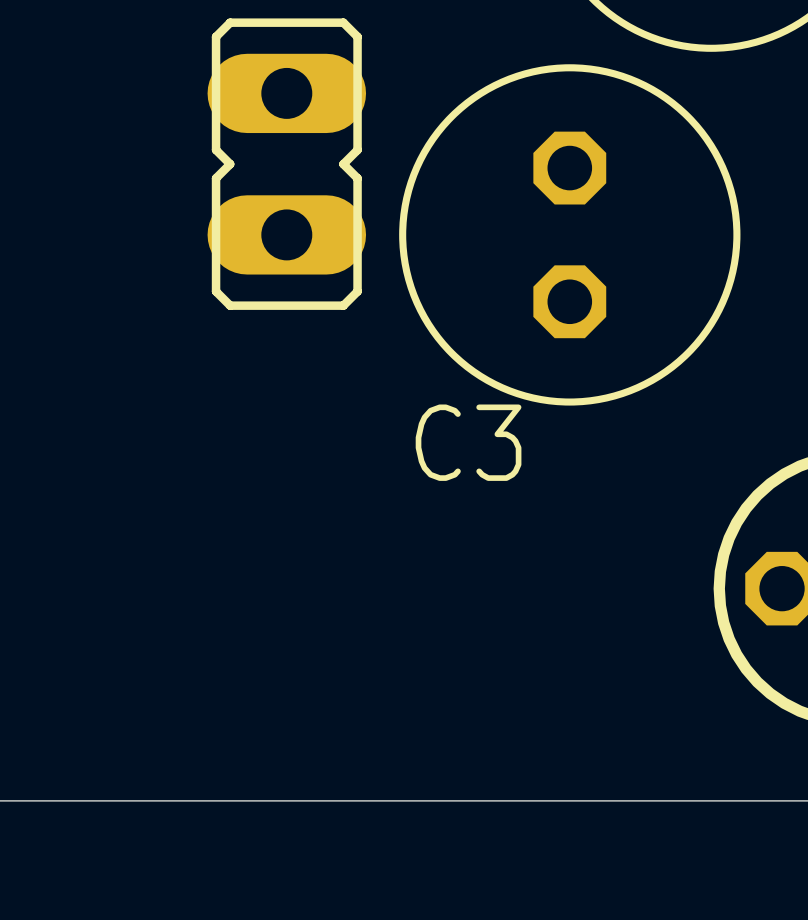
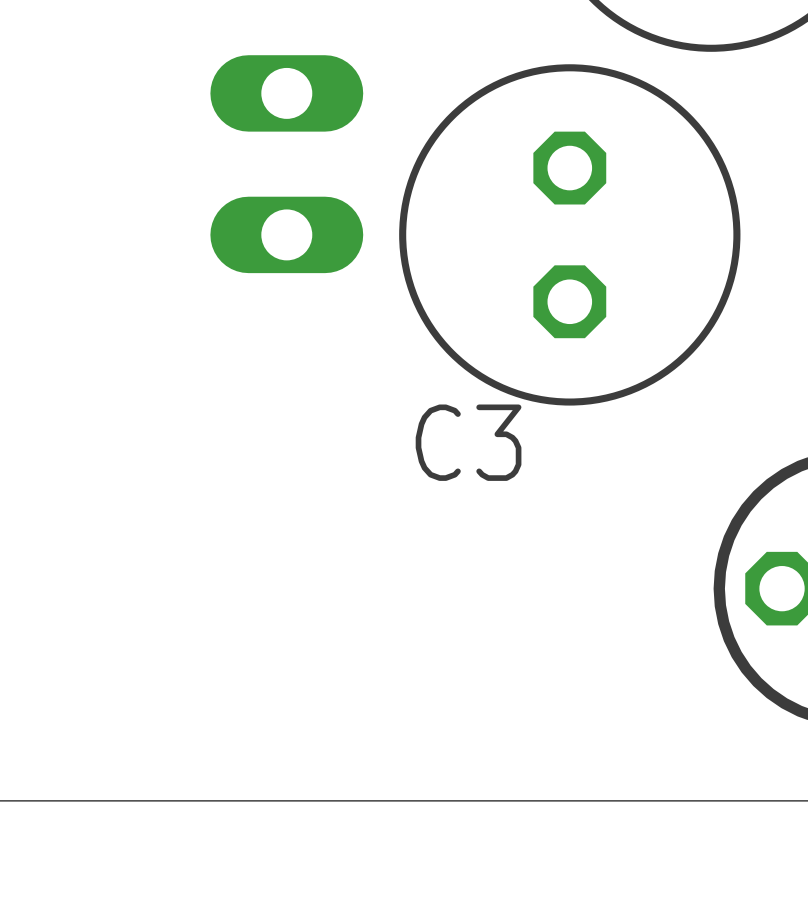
part footprint: [207, 18, 367, 310] -> [210, 55, 364, 274]

